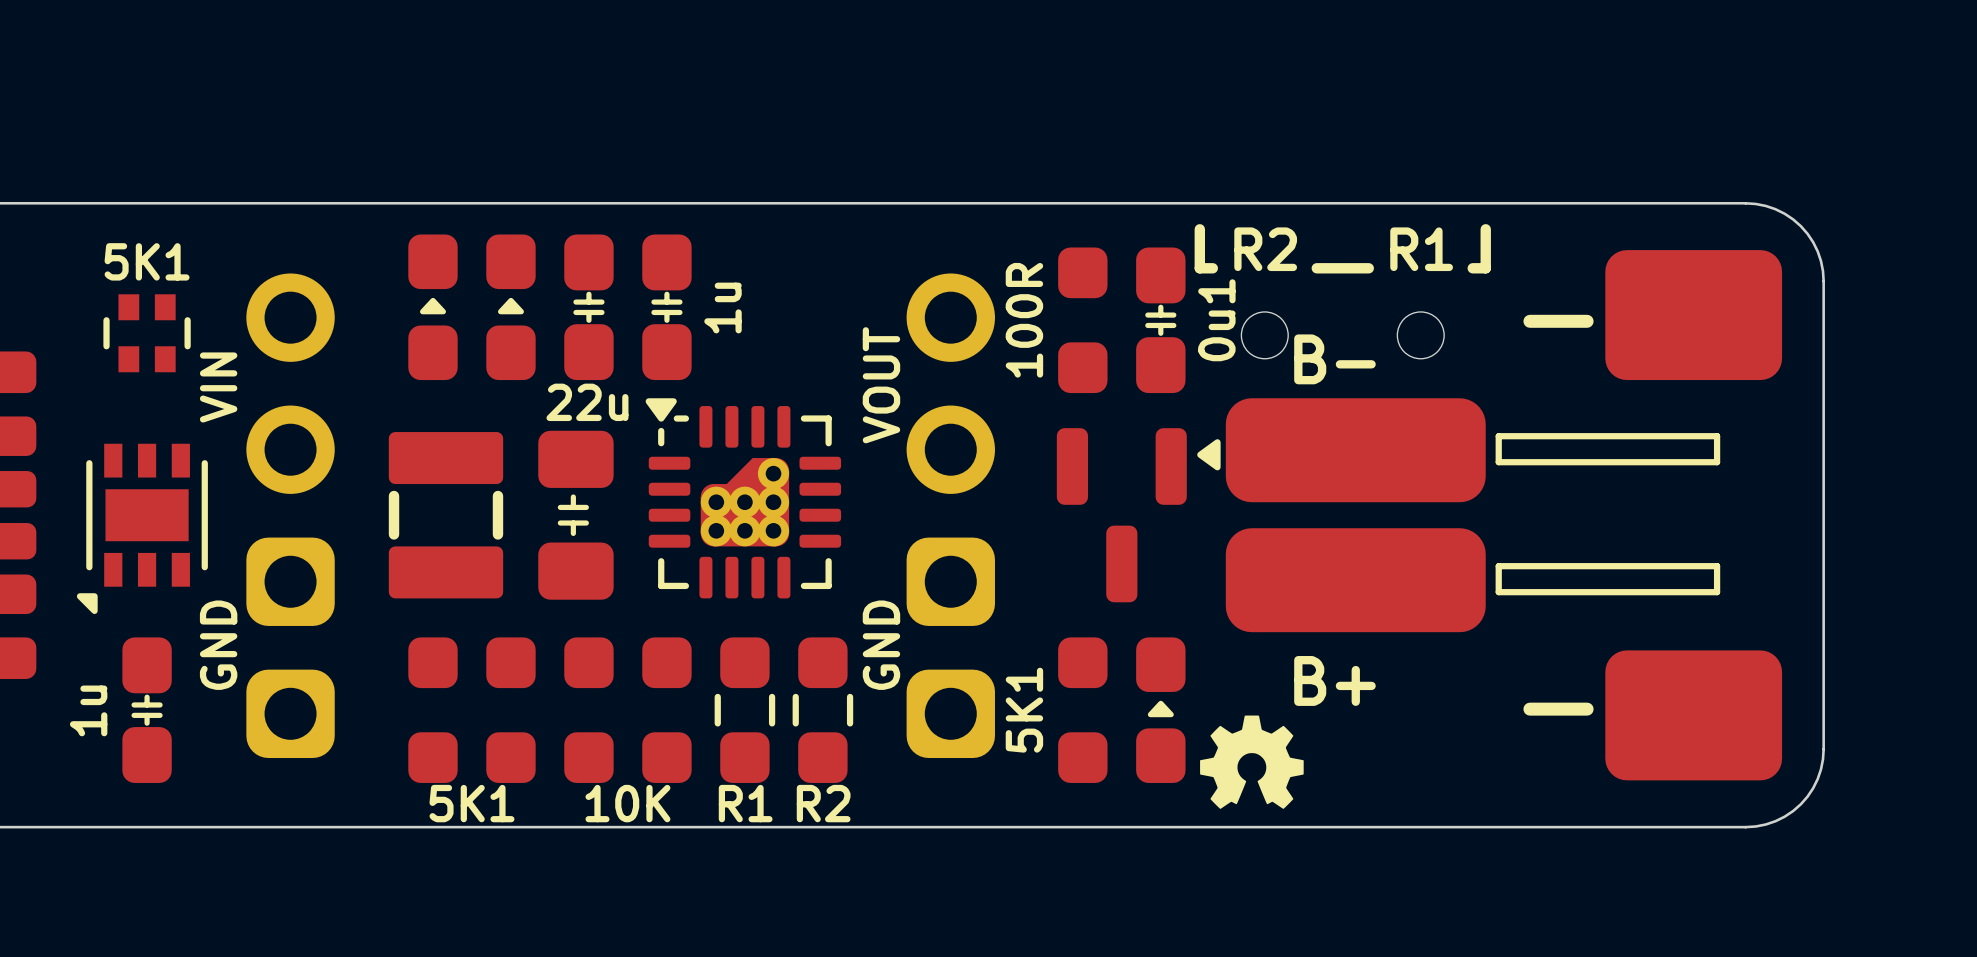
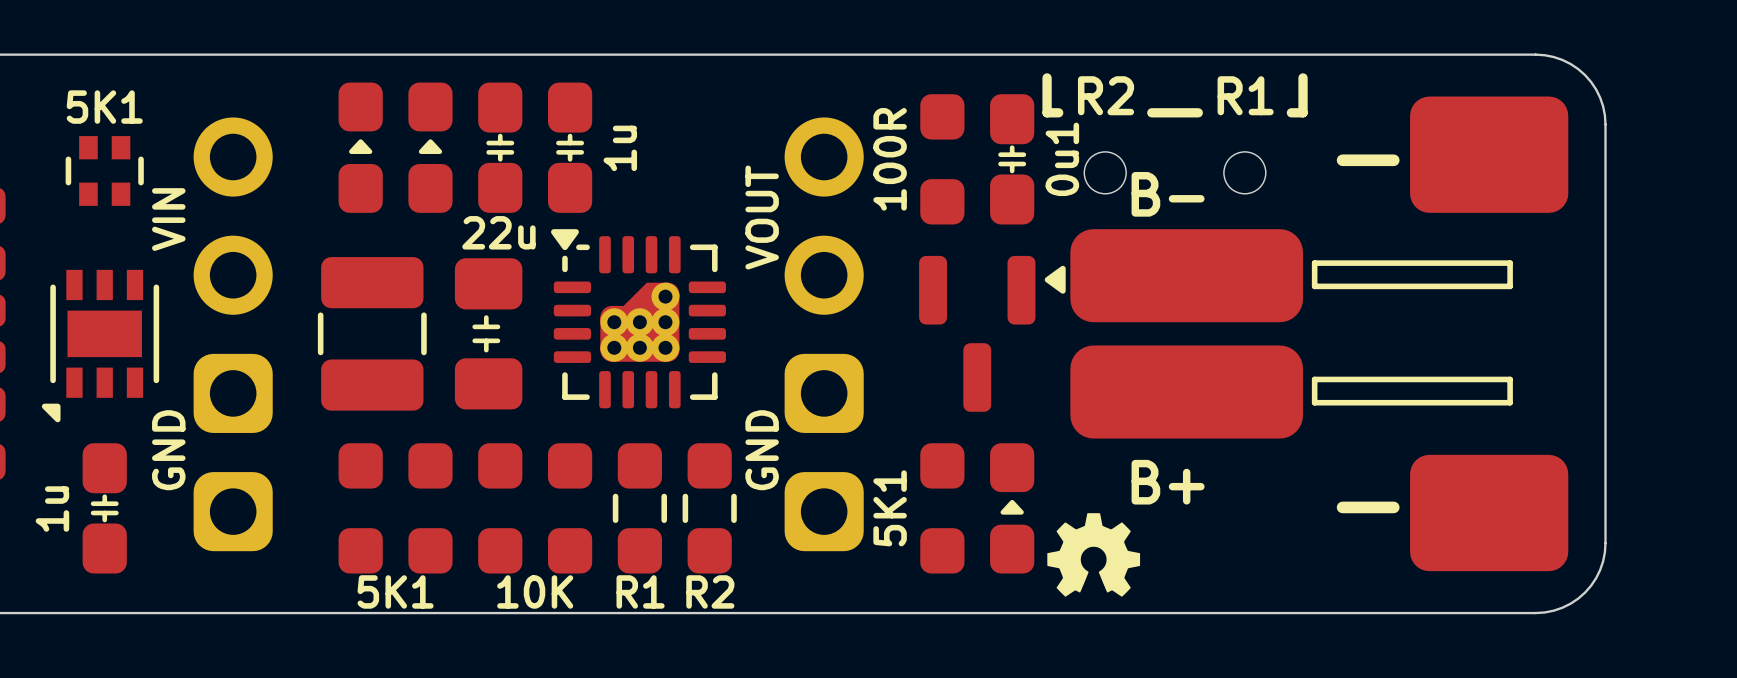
part footprint: [388, 432, 504, 599] -> [317, 257, 427, 411]

